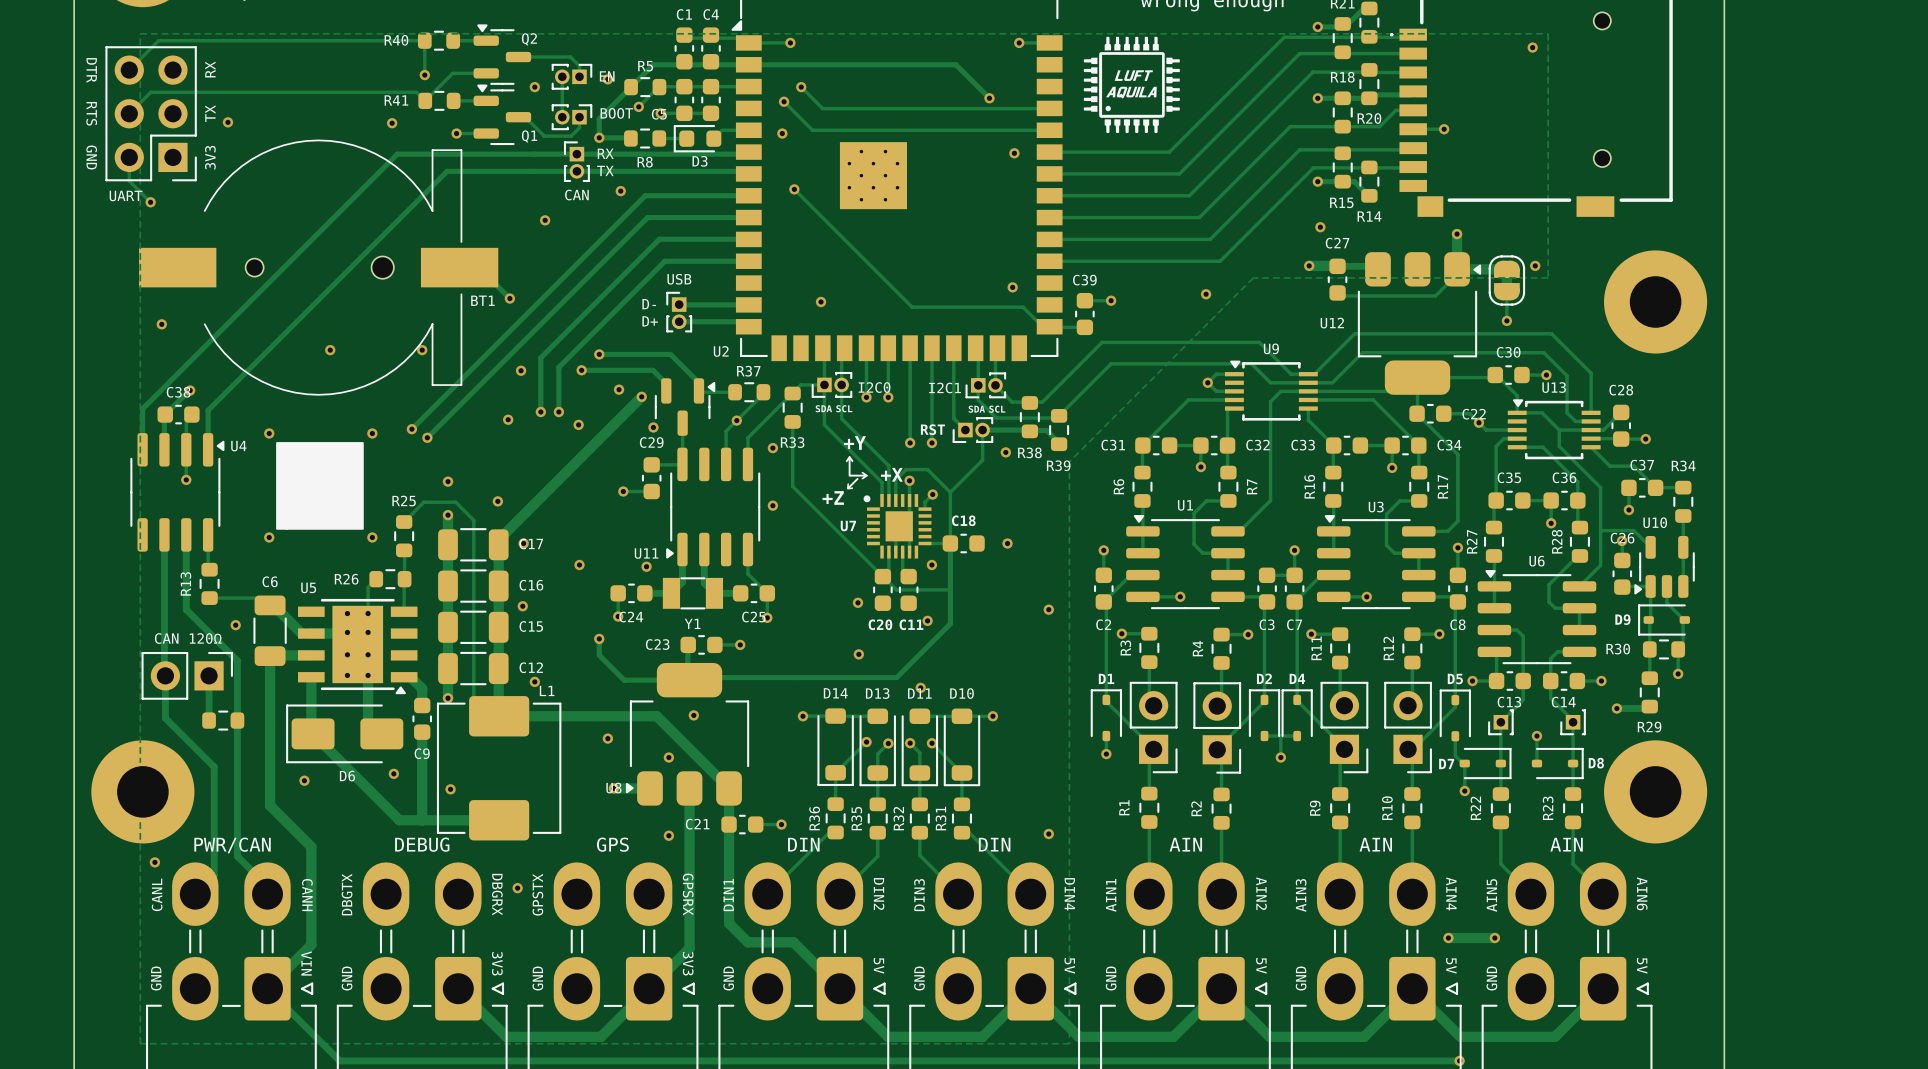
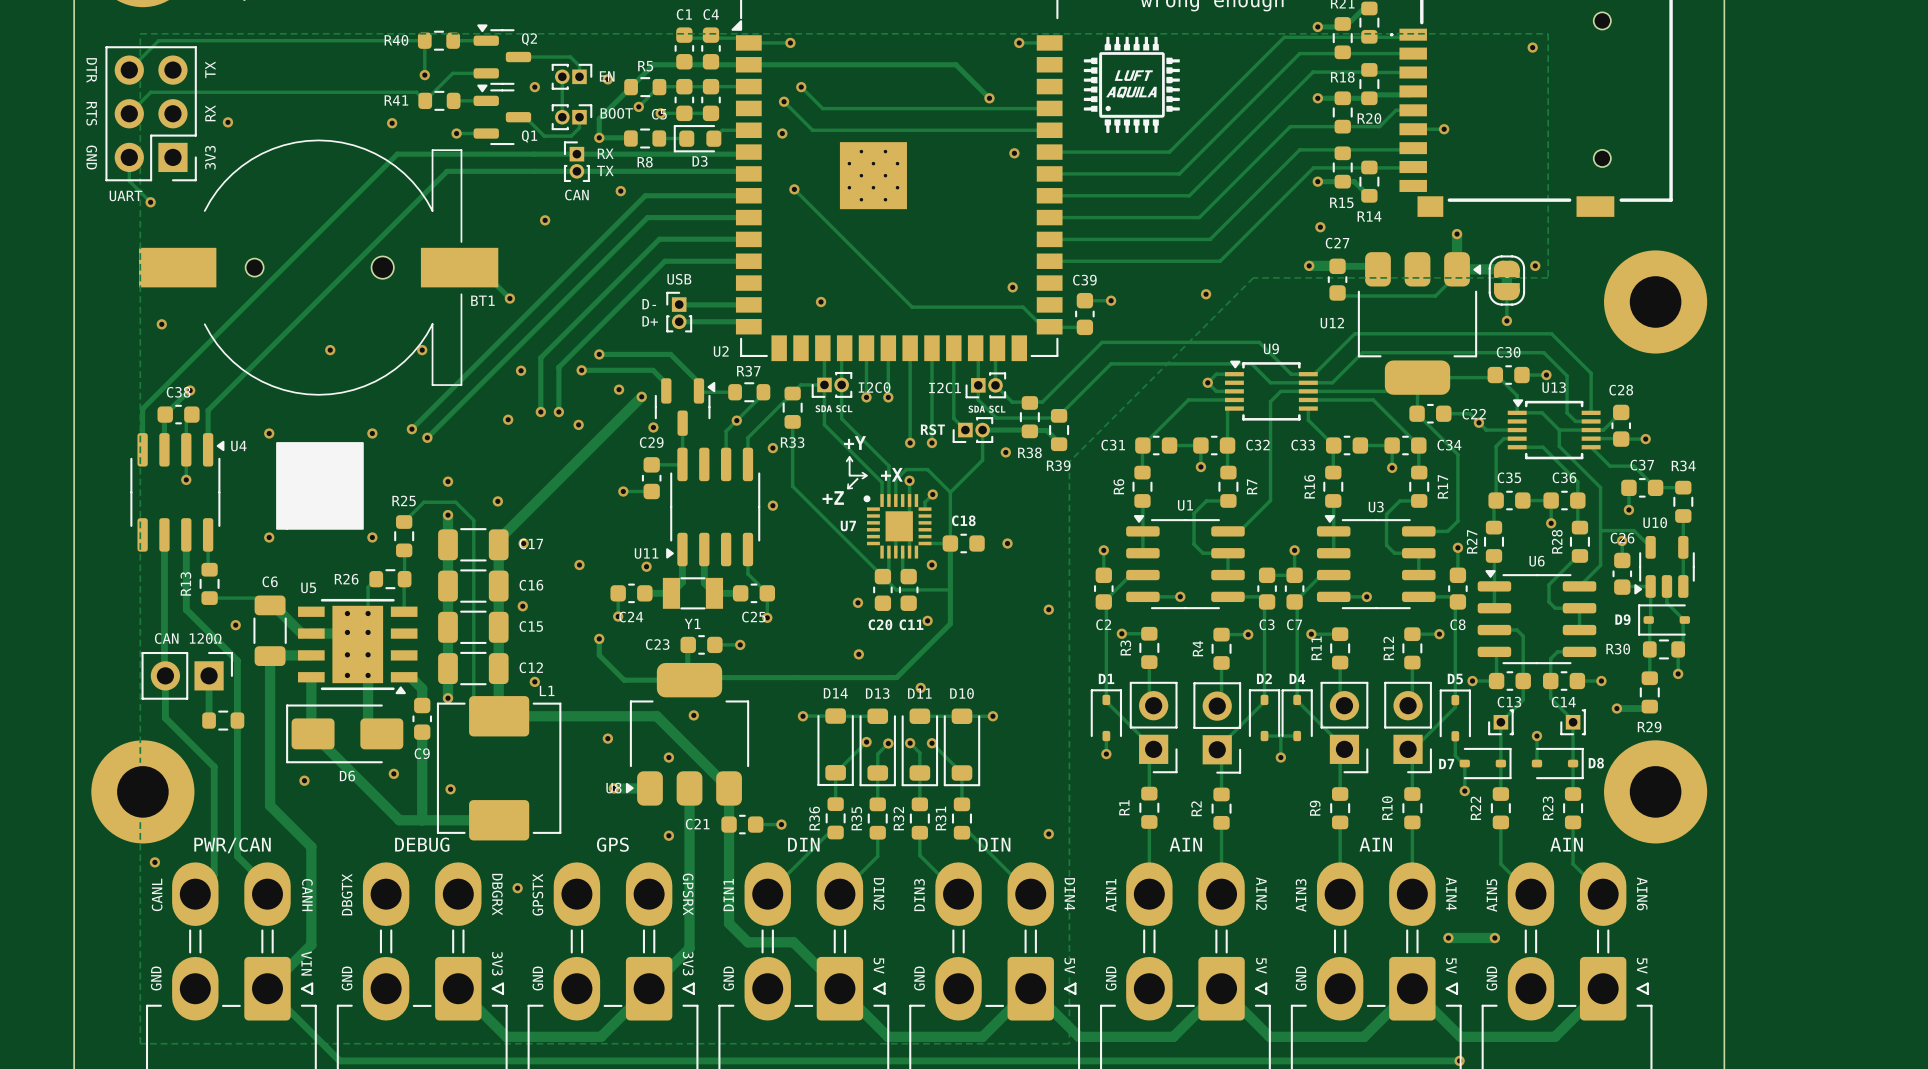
text: RX (210, 69) -> TX (210, 69)
text: TX (210, 113) -> RX (210, 113)

